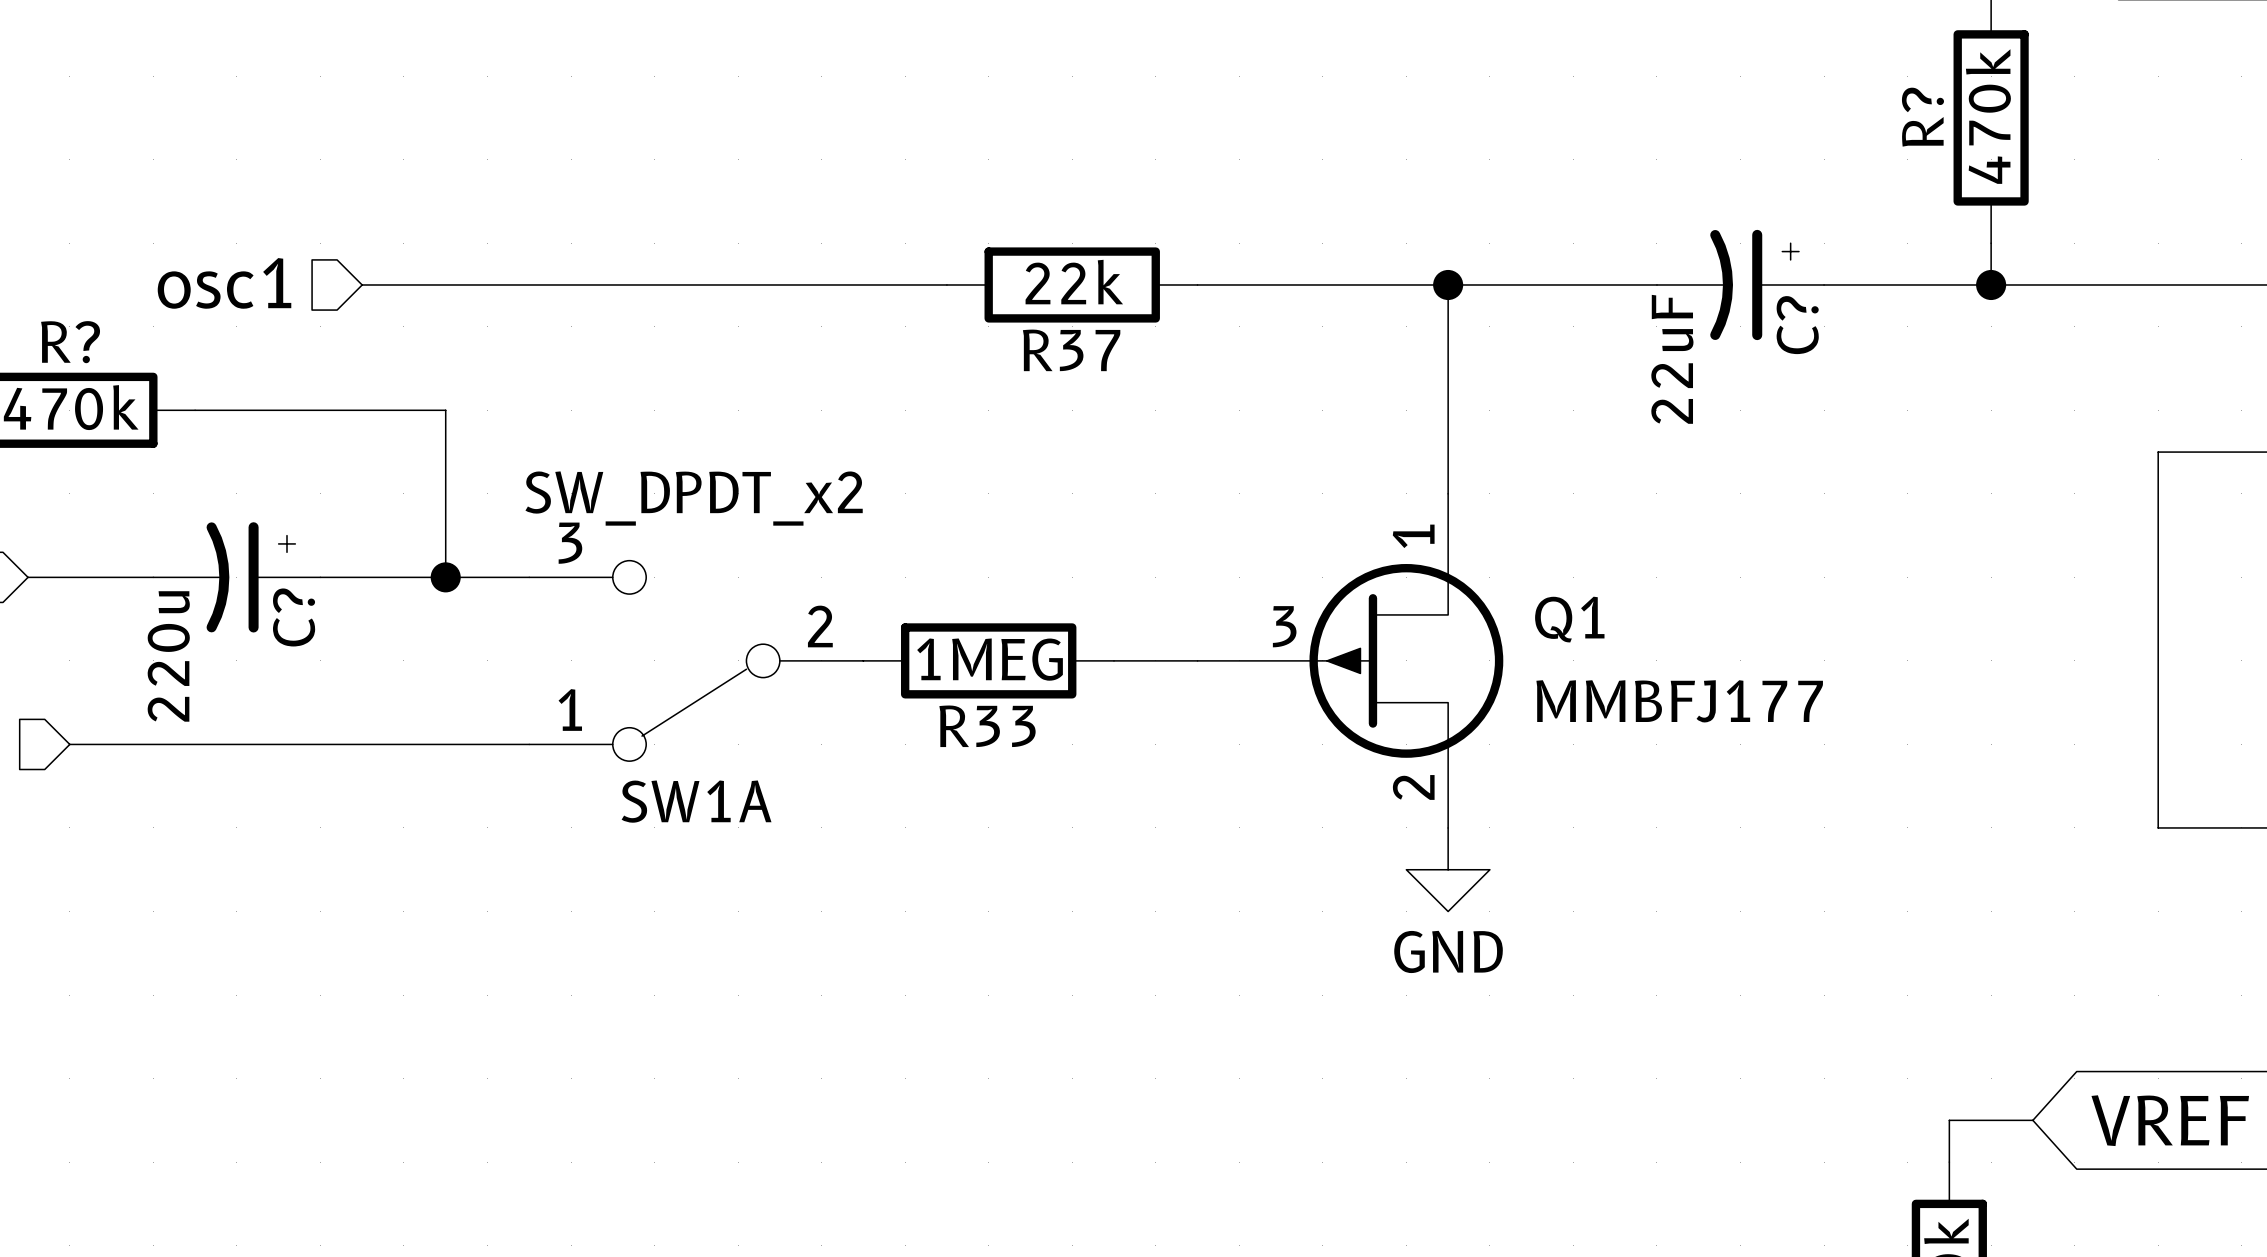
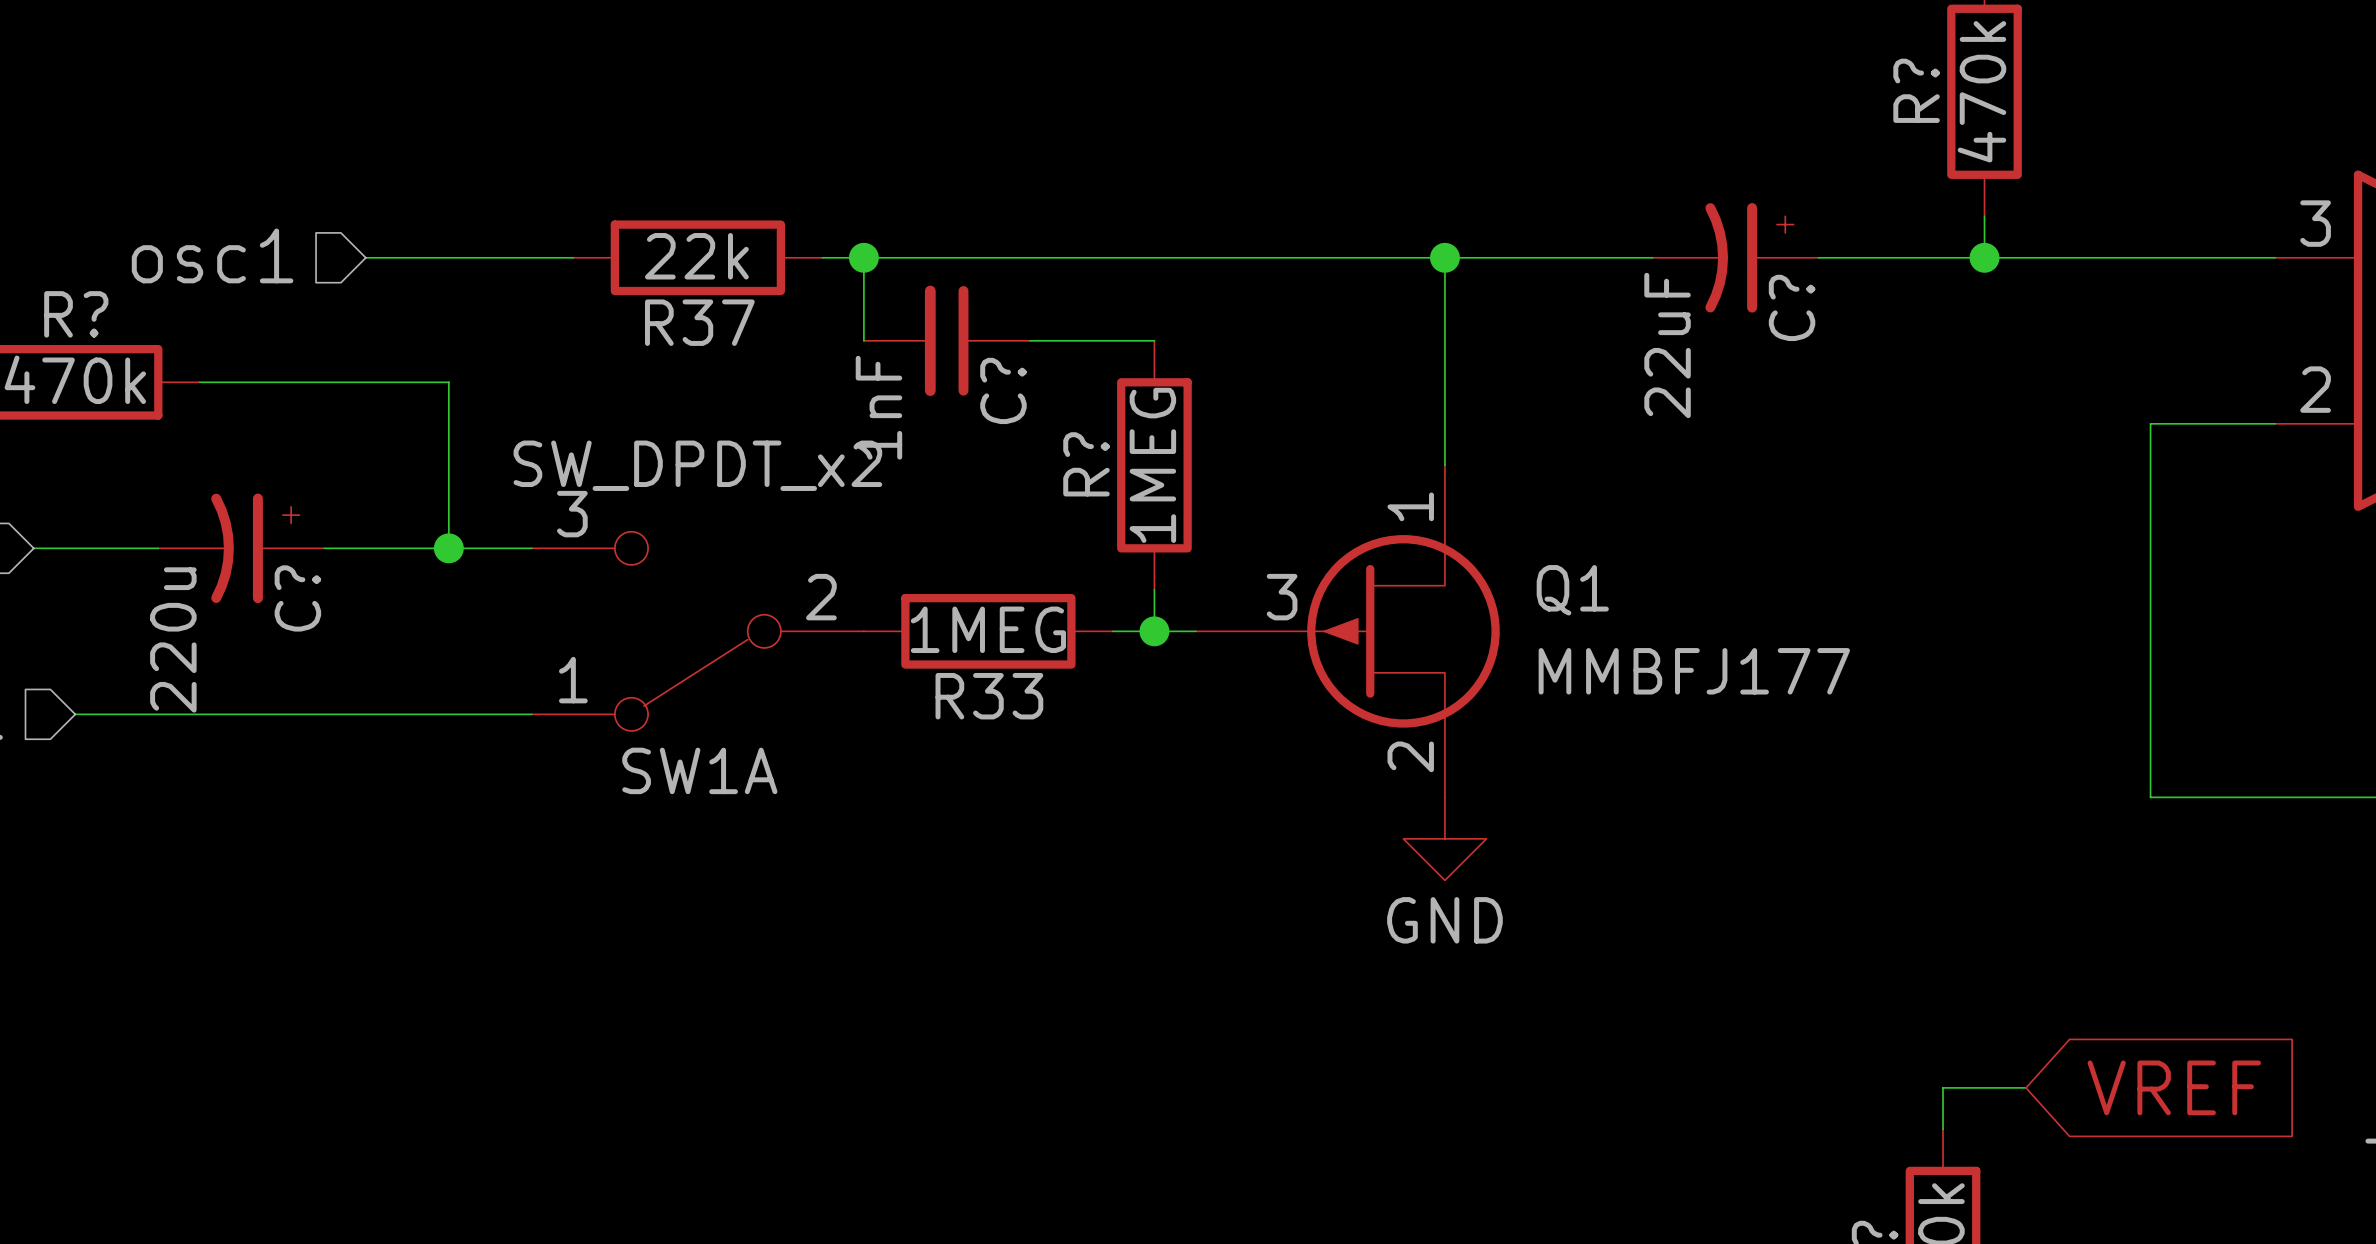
wire: (571, 284) (821, 284) -> (946, 257) (1195, 257)
wire: none -> (863, 257) (863, 340)
junction: none -> (863, 257)
R37 position: (1072, 284) -> (697, 257)
C?: none -> 1nF (946, 340)
wire: none -> (1029, 340) (1154, 340)
R?: none -> 1MEG (1154, 465)
wire: none -> (1154, 589) (1154, 631)
junction: none -> (1154, 631)

